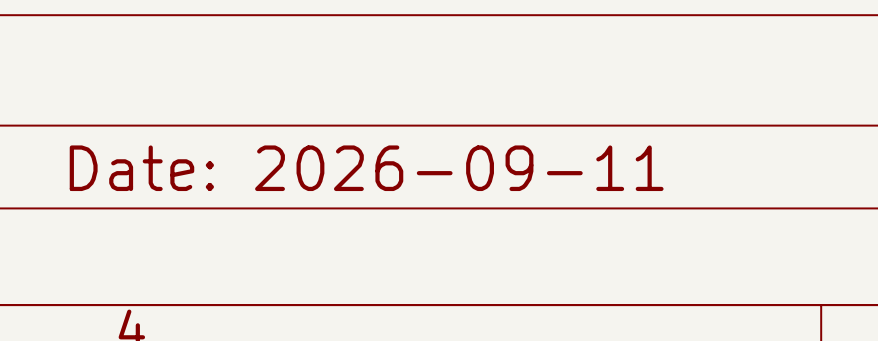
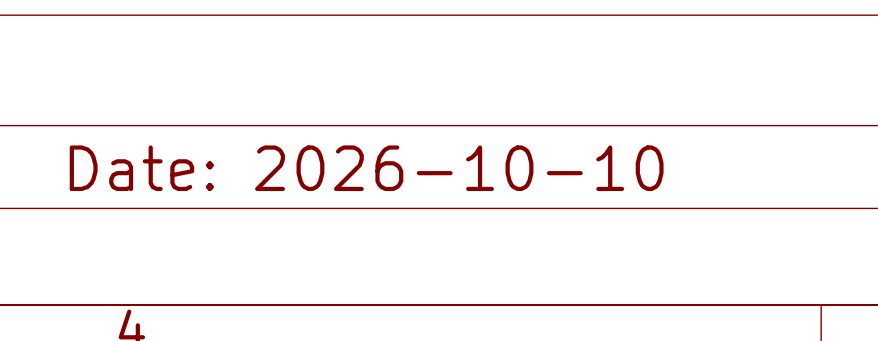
title block: Date: 2026-09-11 (366, 168) -> Date: 2026-10-10 (366, 168)

